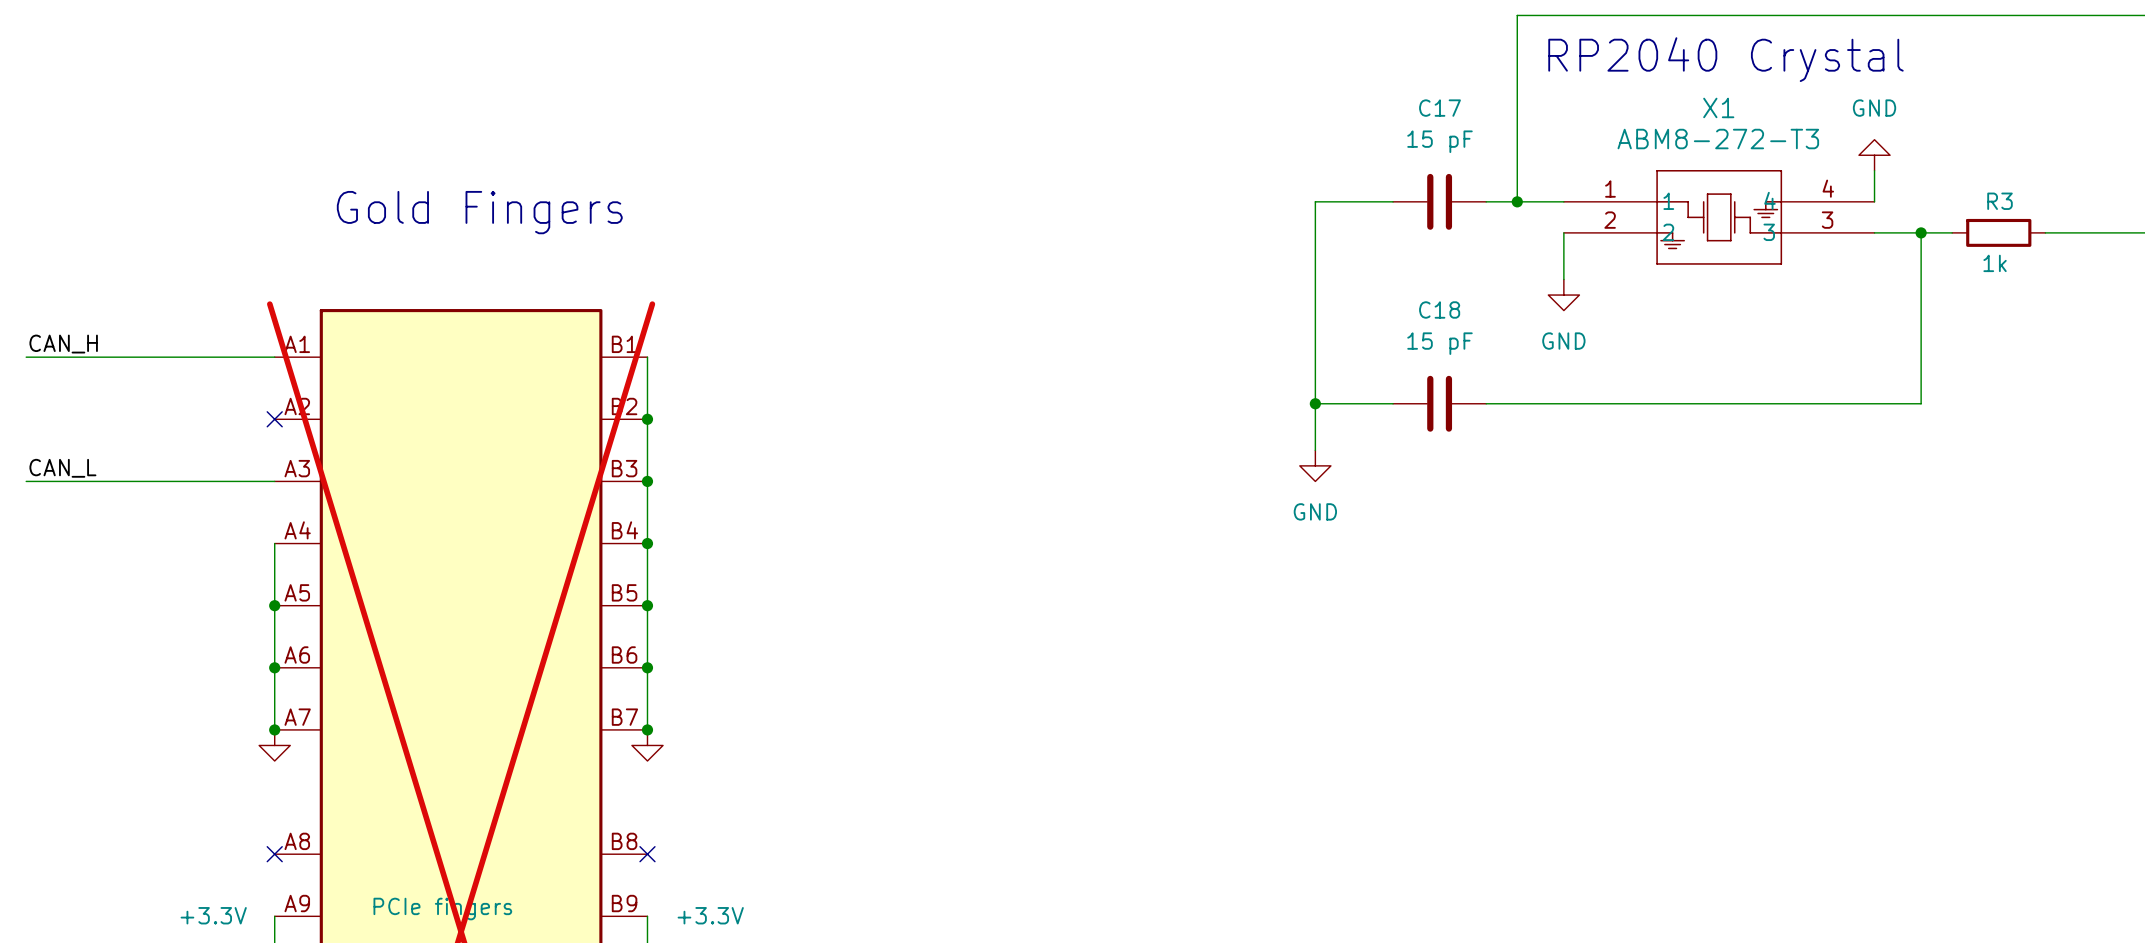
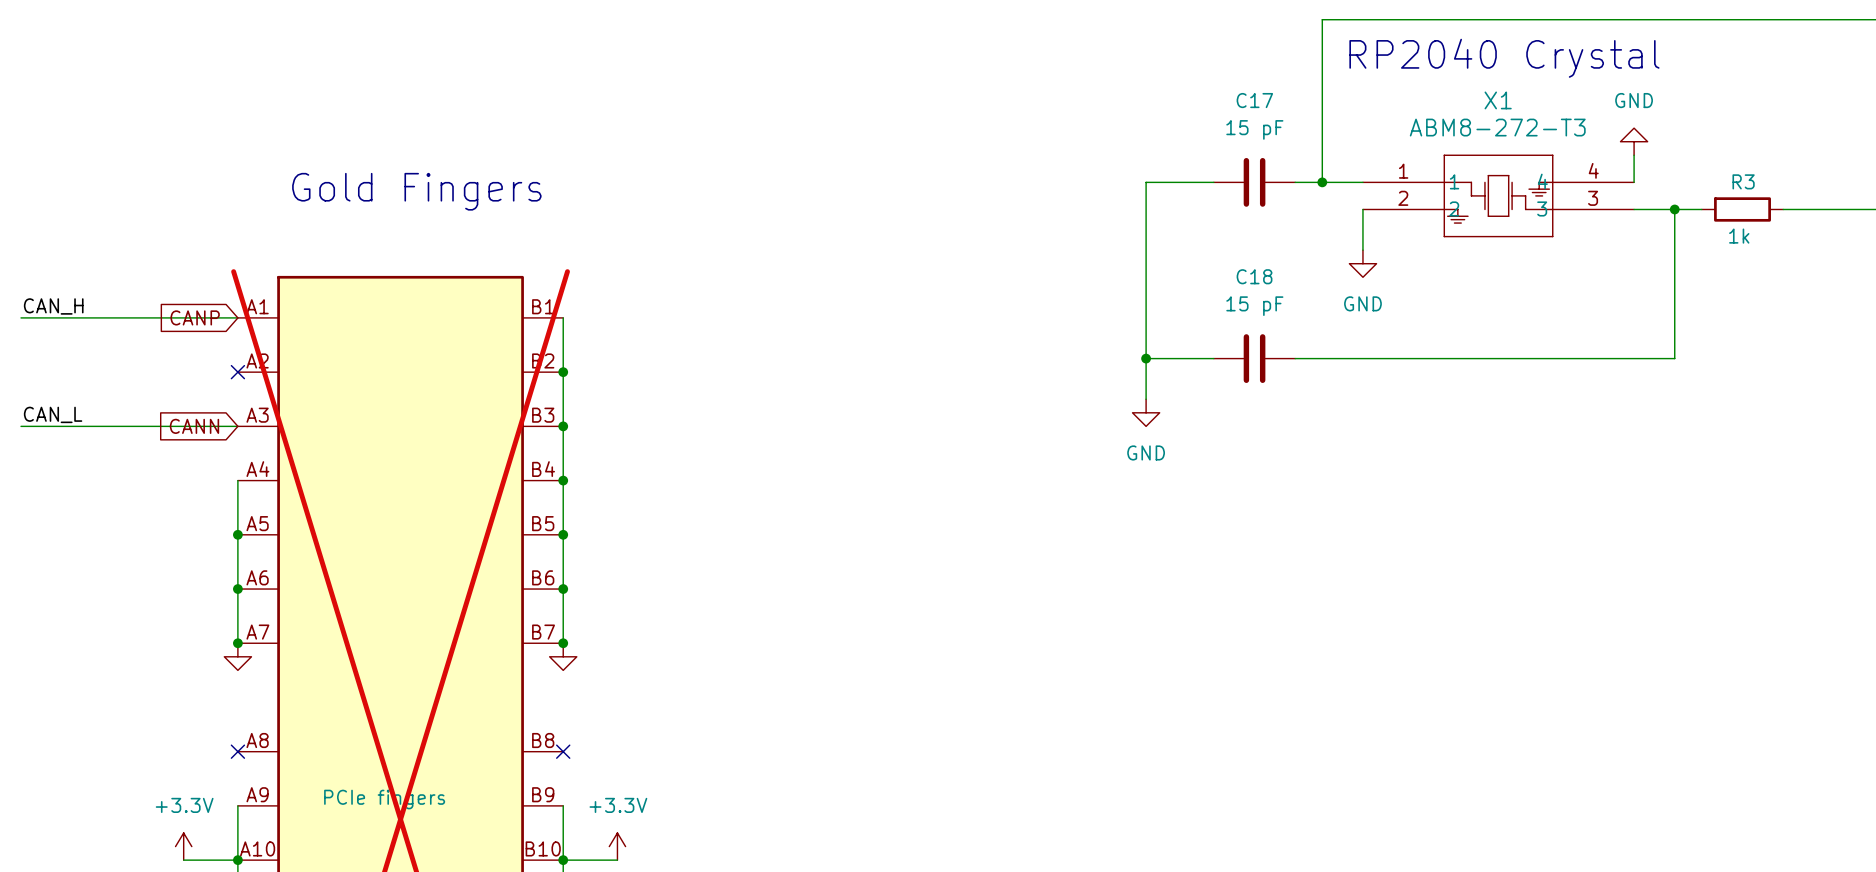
global label: none -> CANP (195, 317)
global label: none -> CANN (194, 426)

